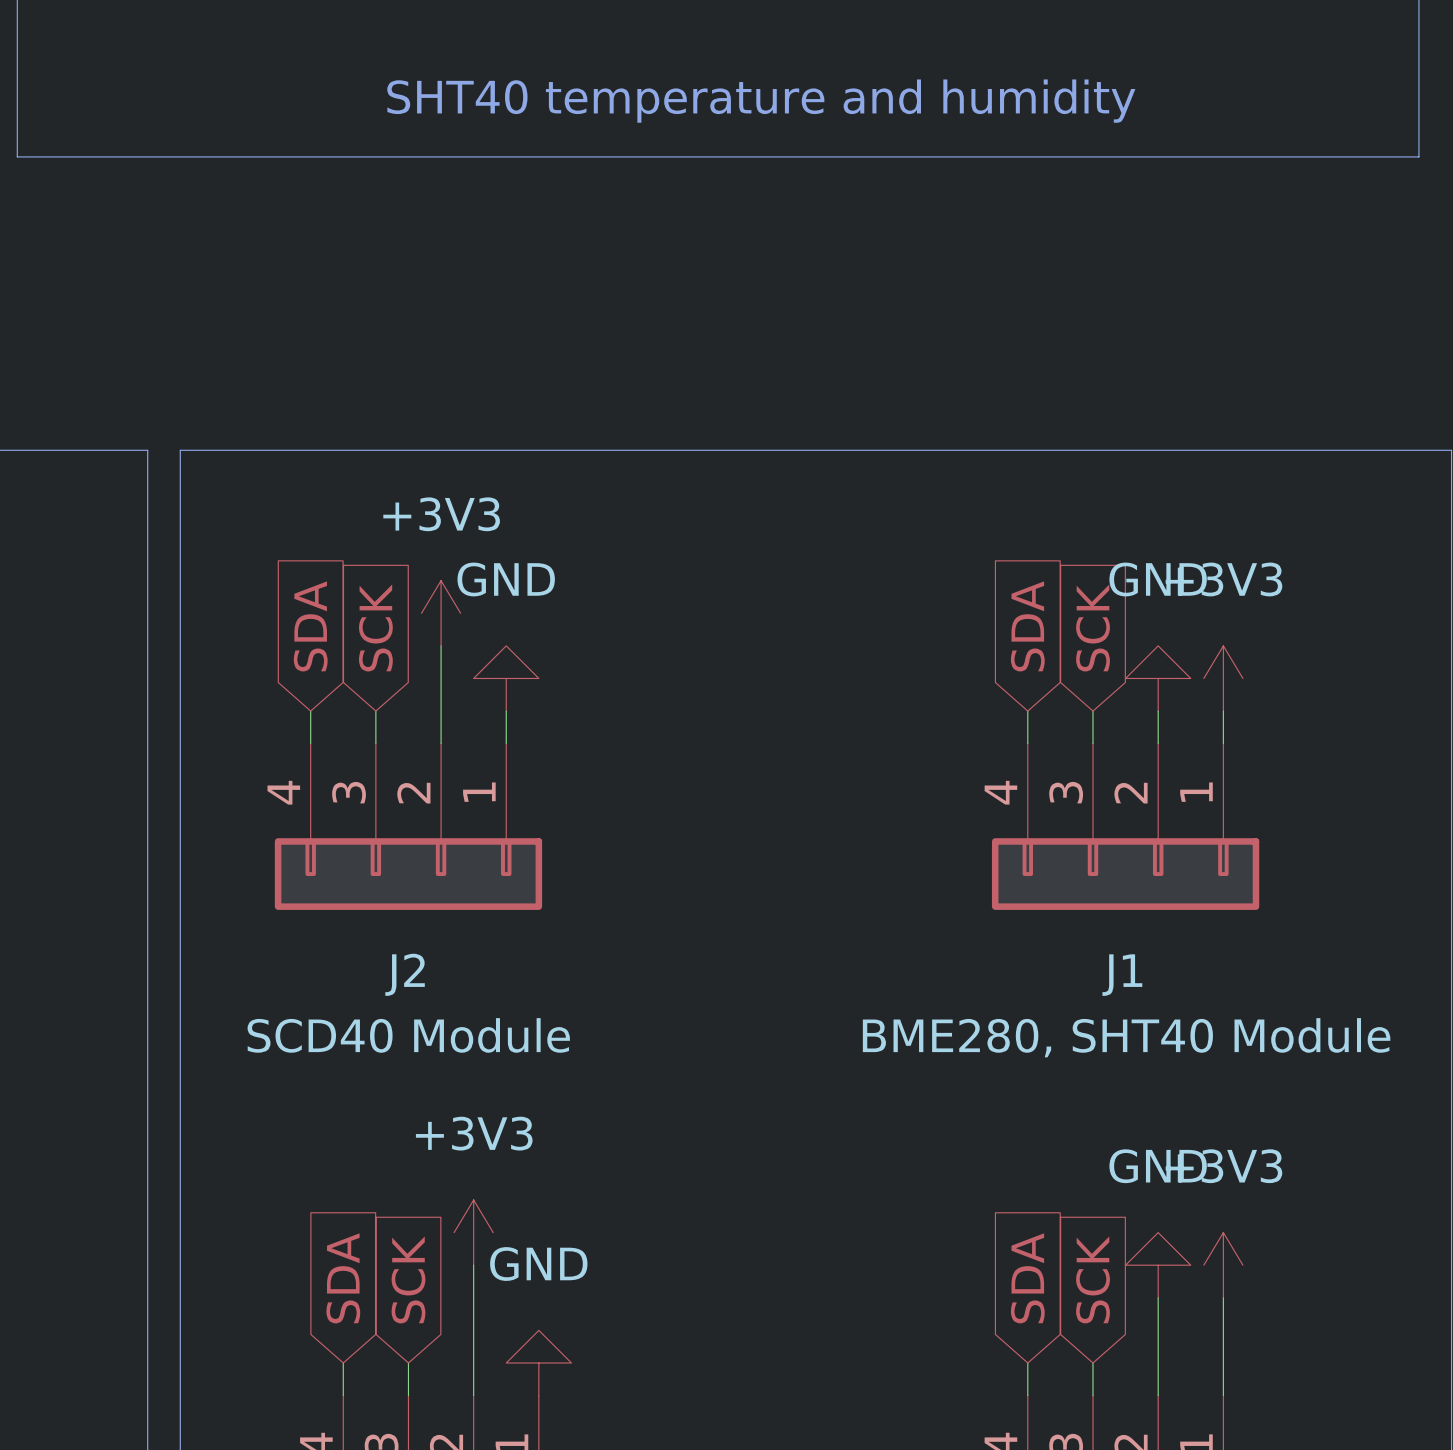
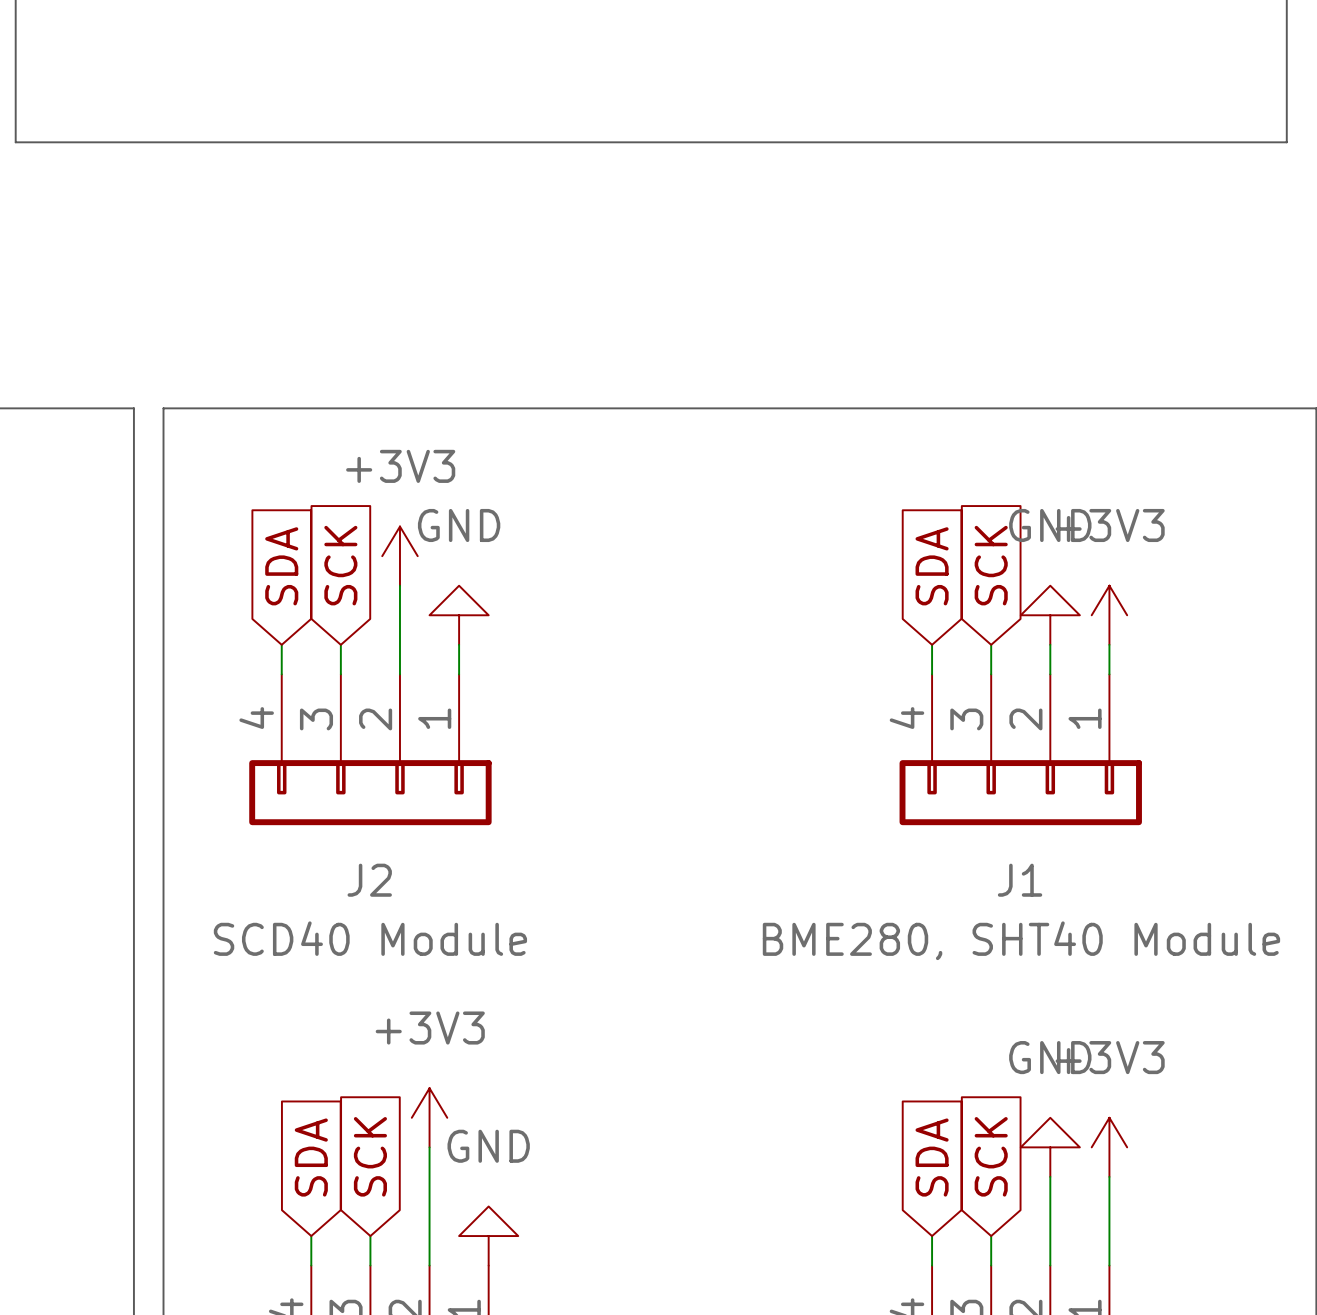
text: SHT40 temperature and humidity (761, 101) -> none

